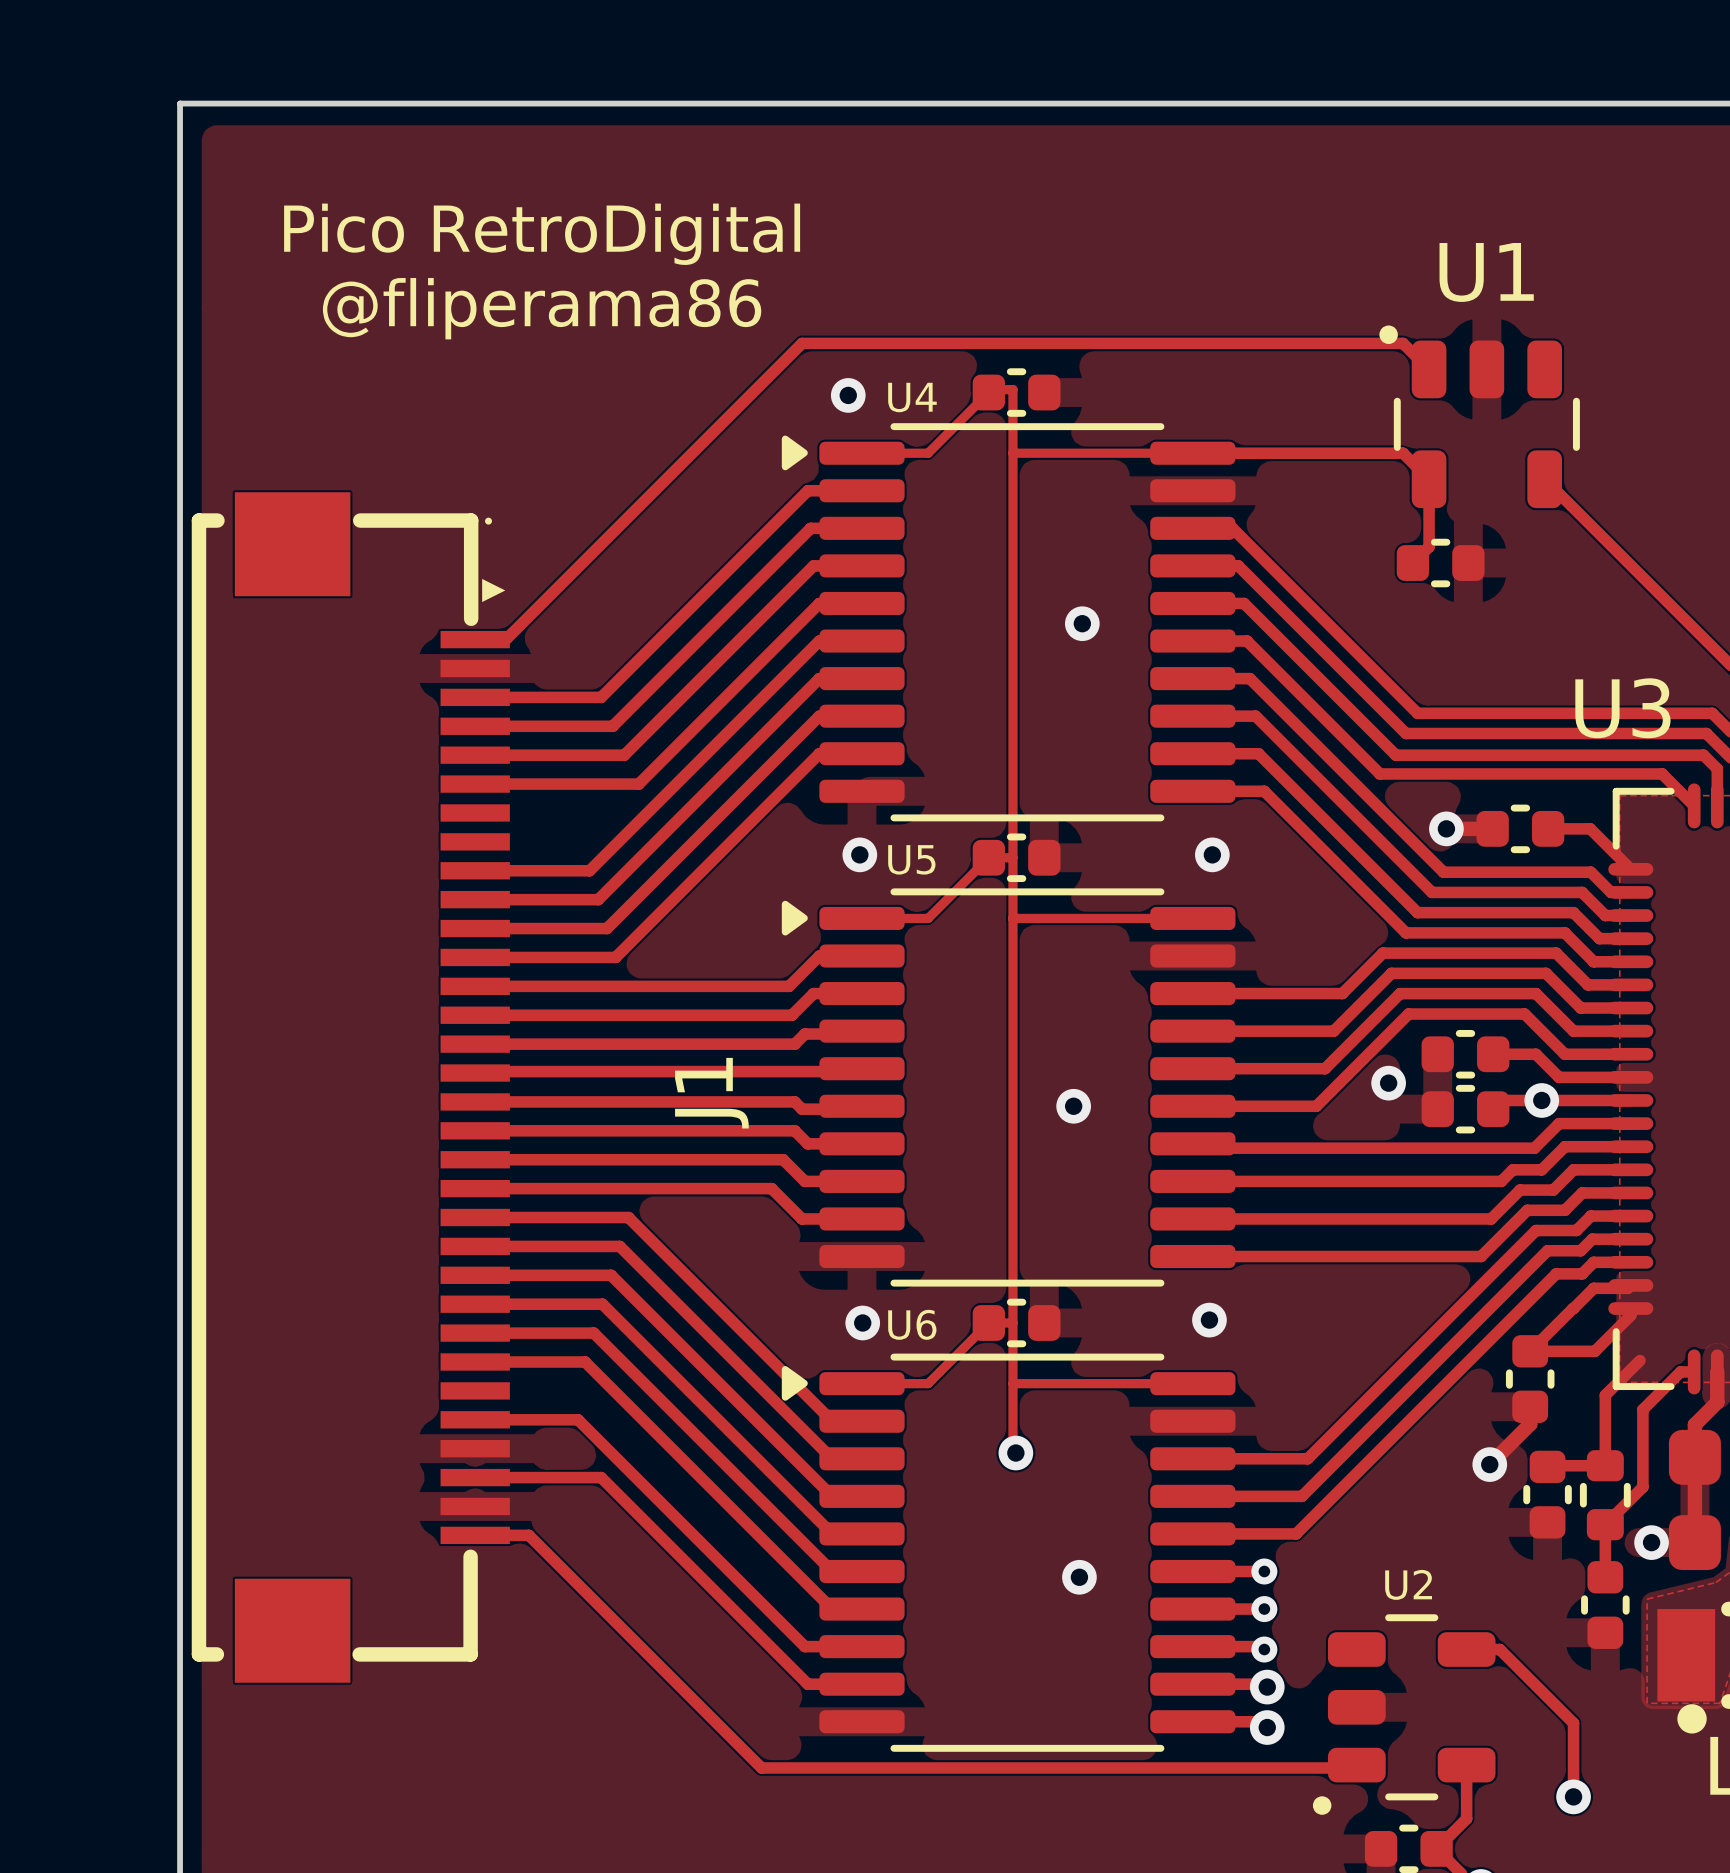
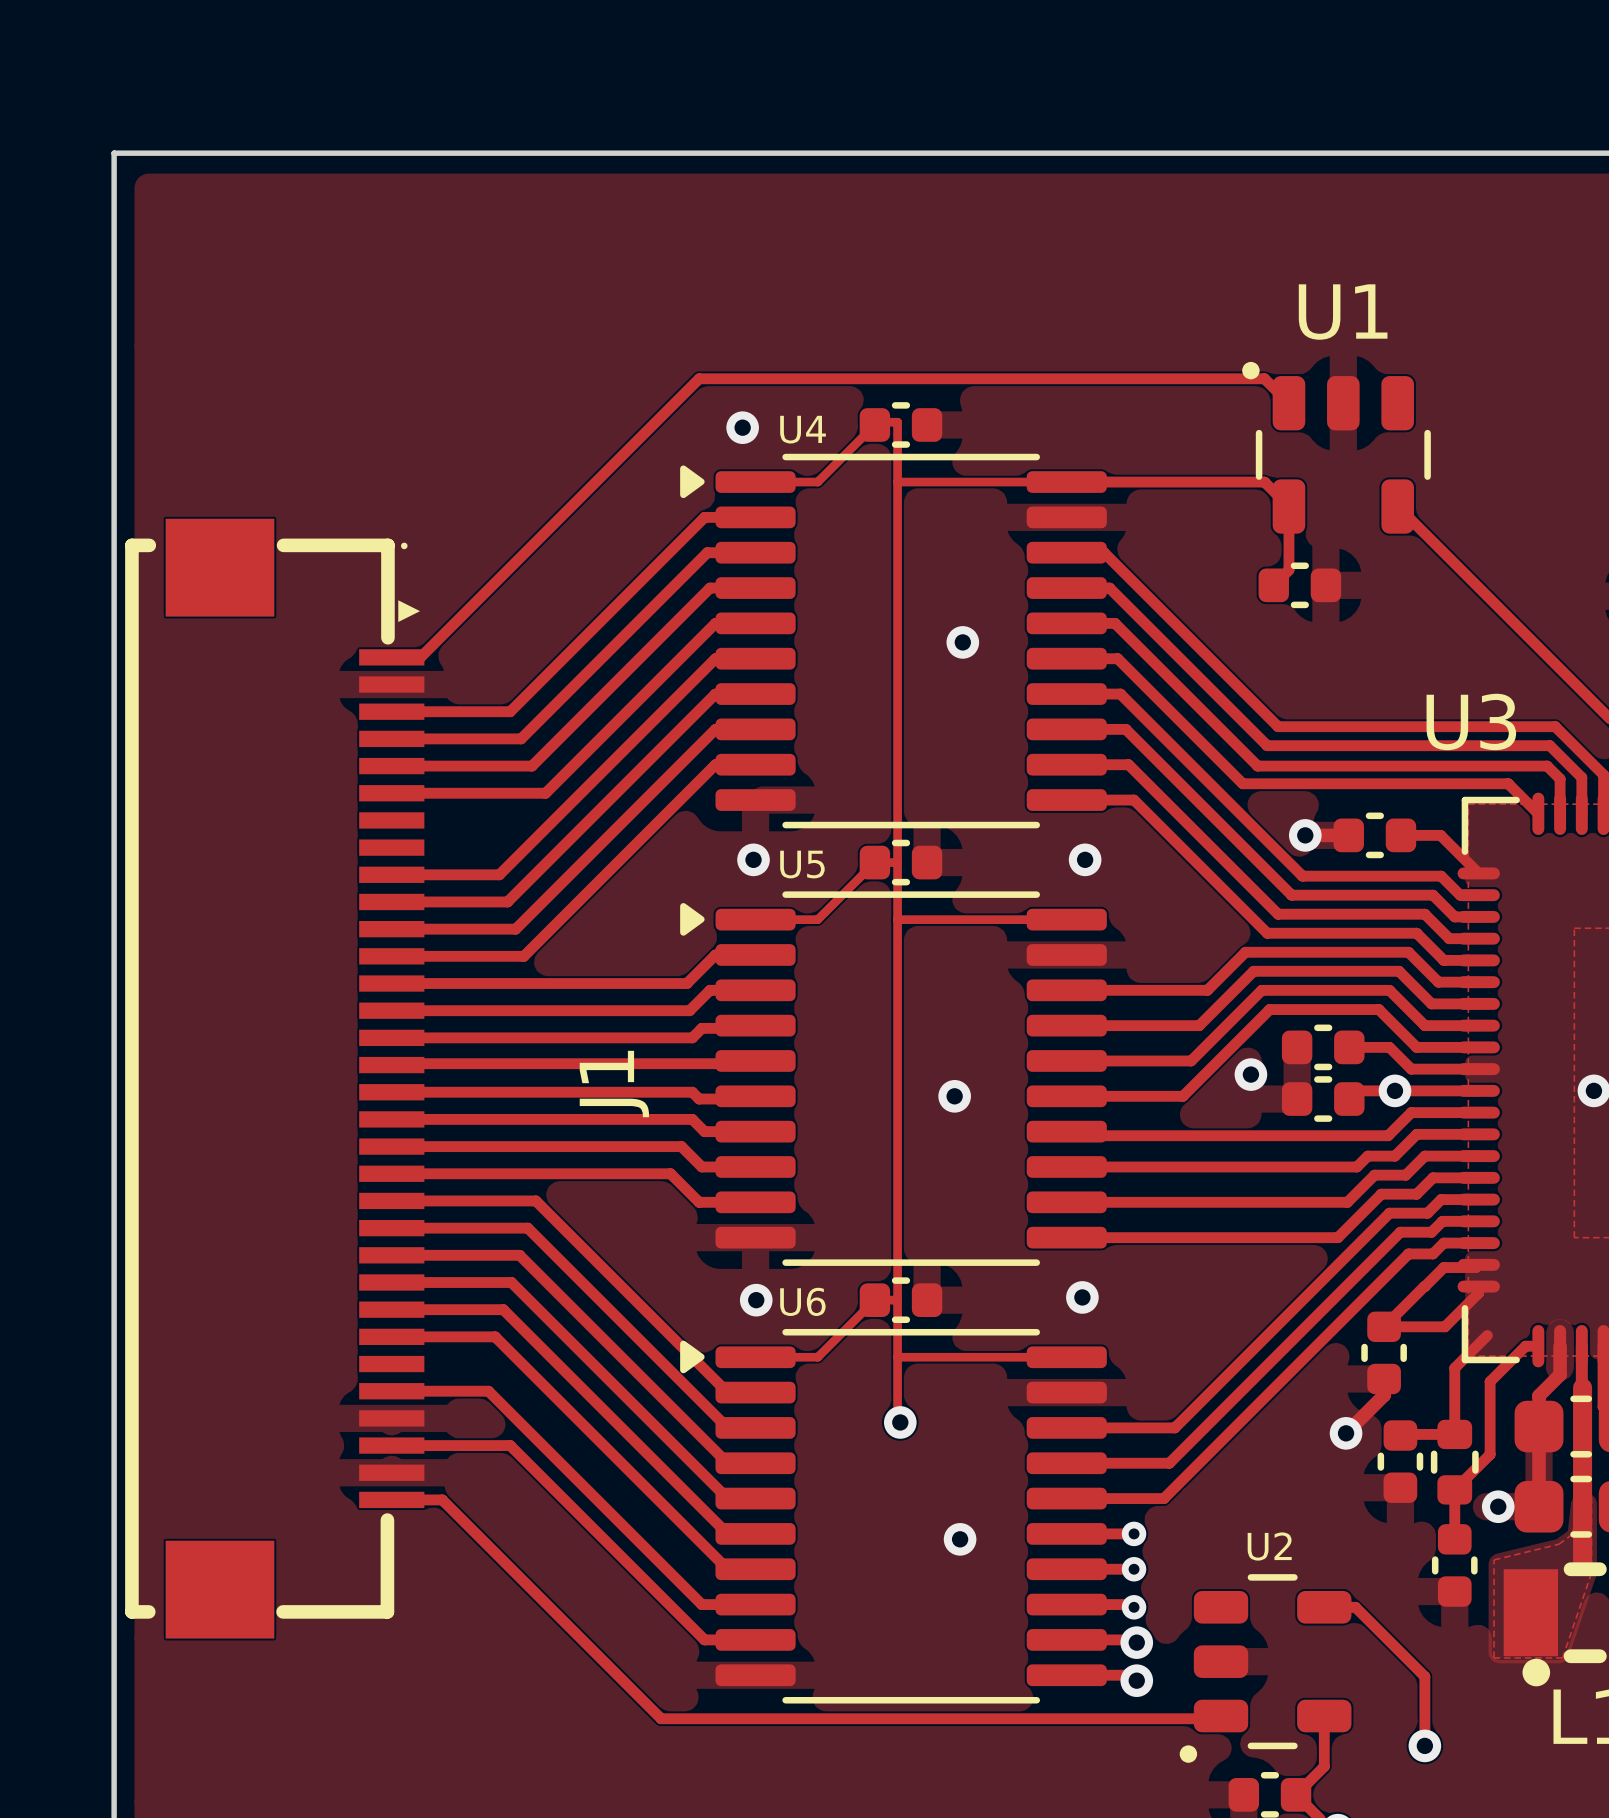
text: Pico RetroDigital (542, 234) -> none
text: @fliperama86 (542, 308) -> none

